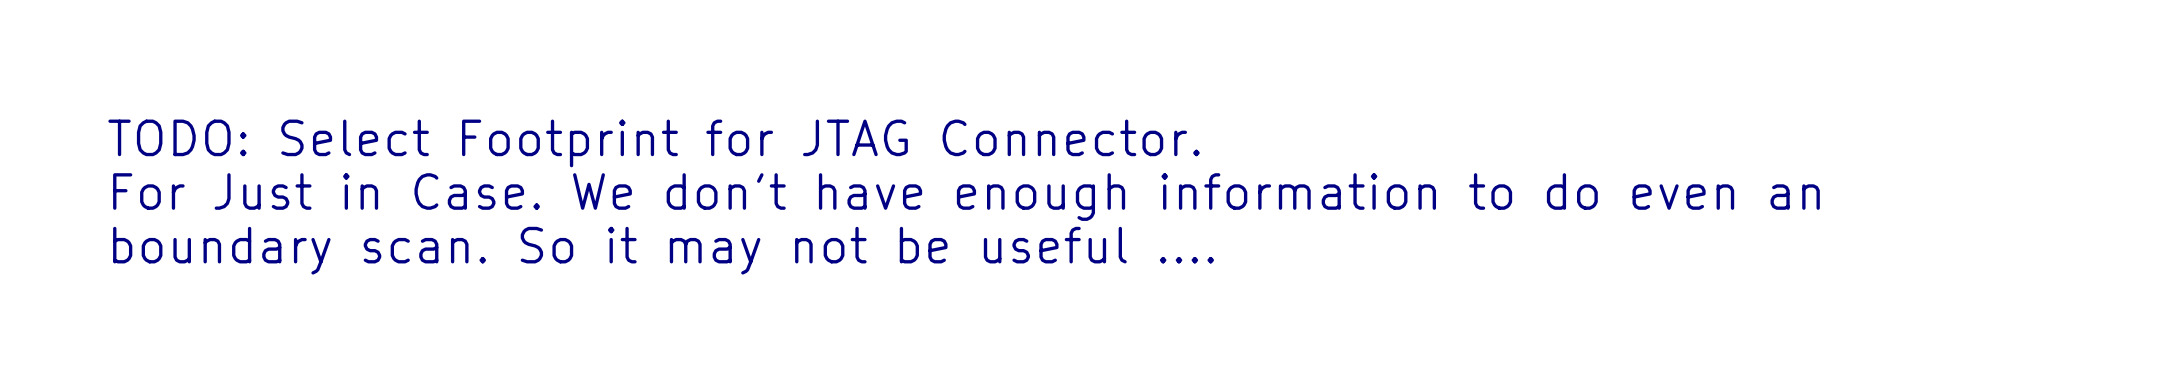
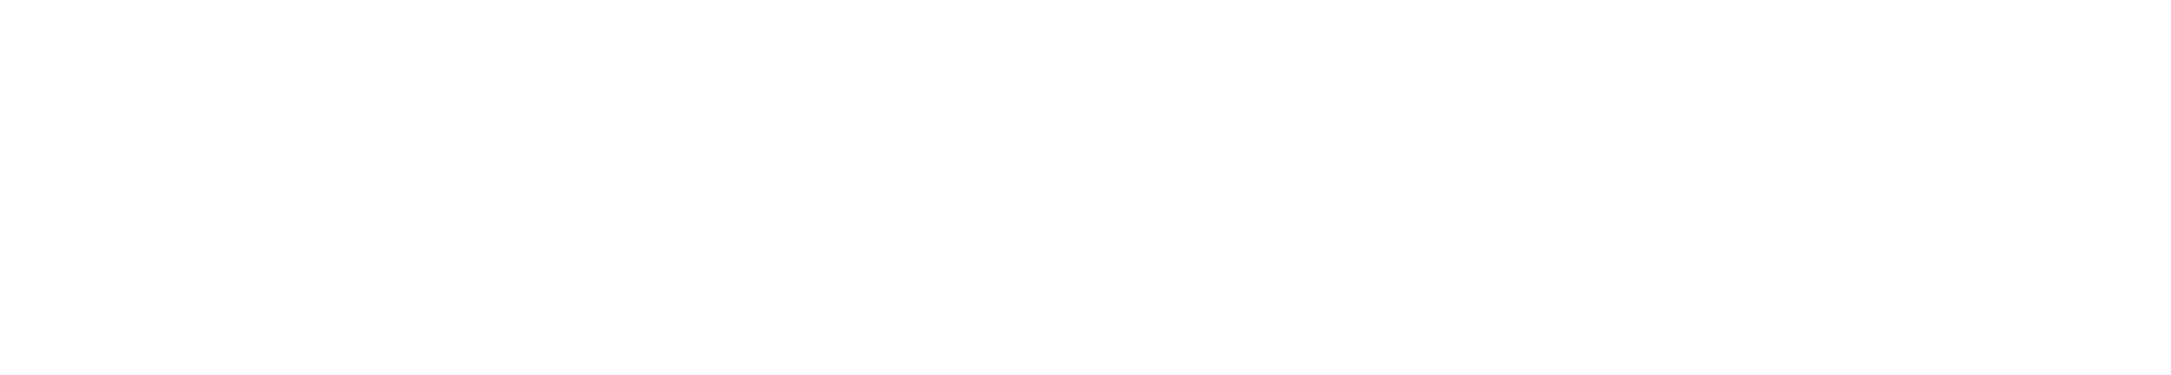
text: TODO: Select Footprint for JTAG Connector. (654, 143) -> none
text: For Just in Case. We don't have enough information to do even an (966, 197) -> none
text: boundary scan. So it may not be useful .... (663, 250) -> none

